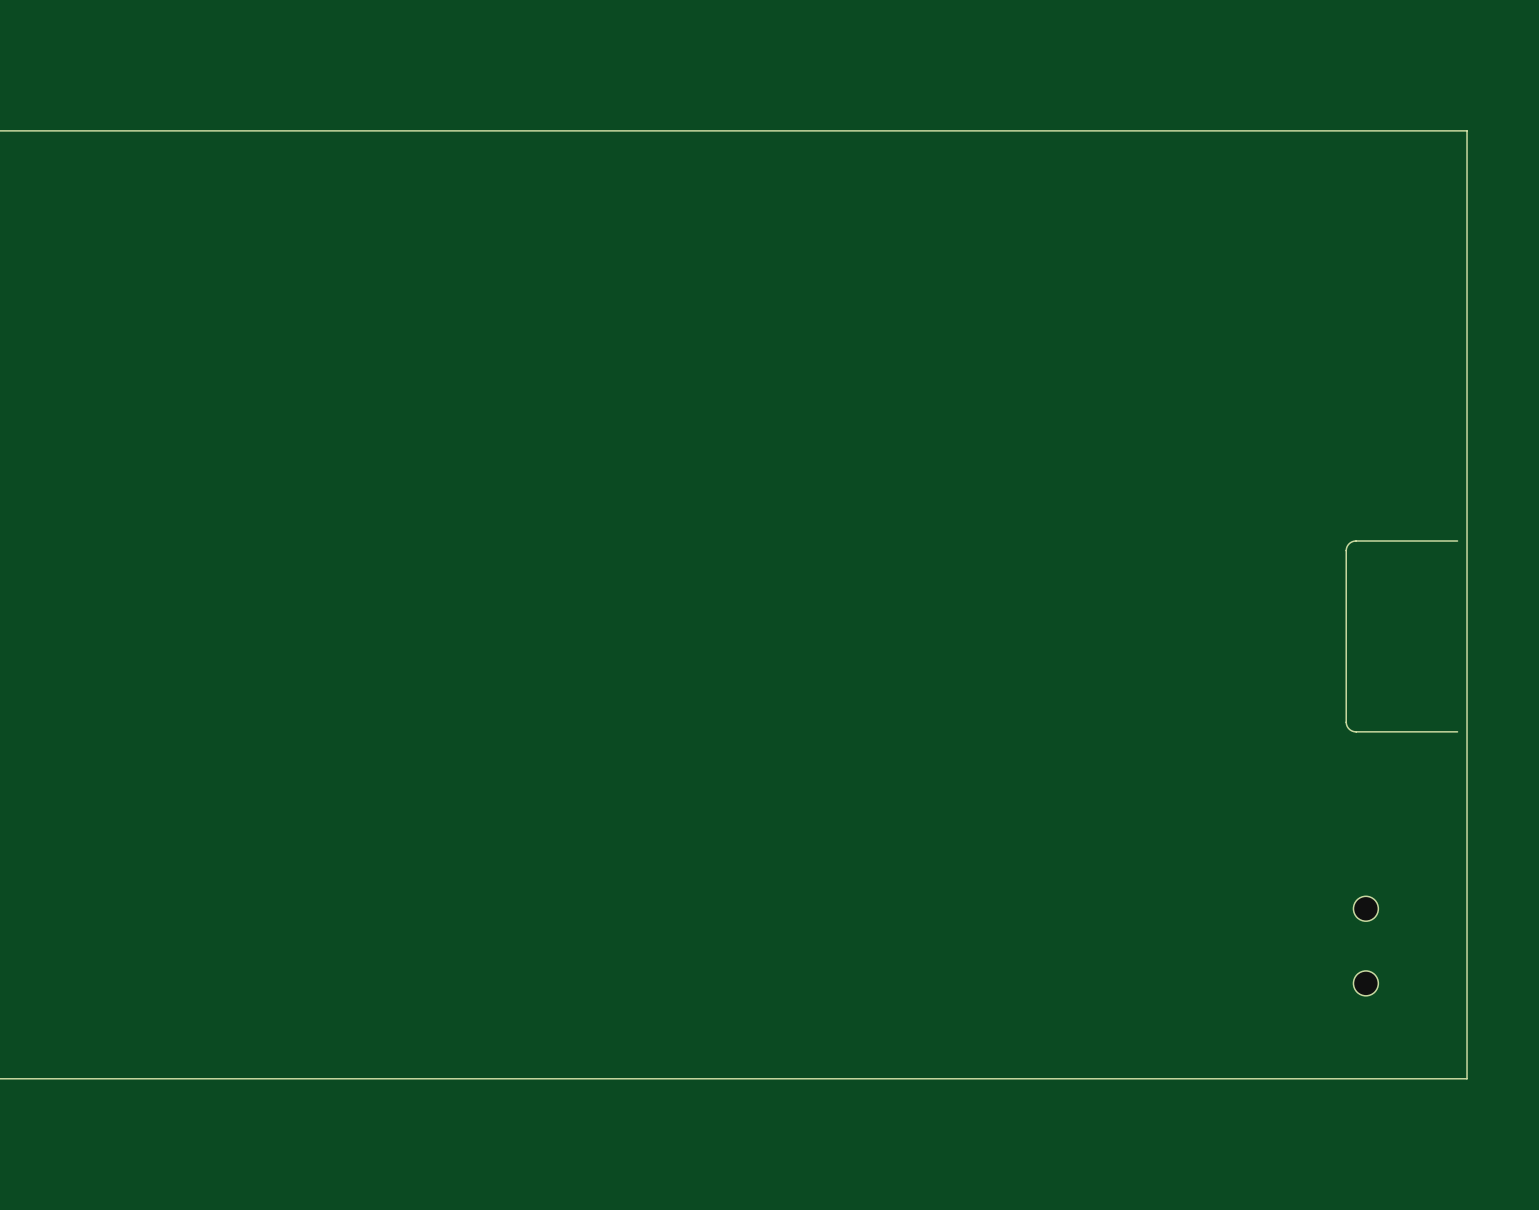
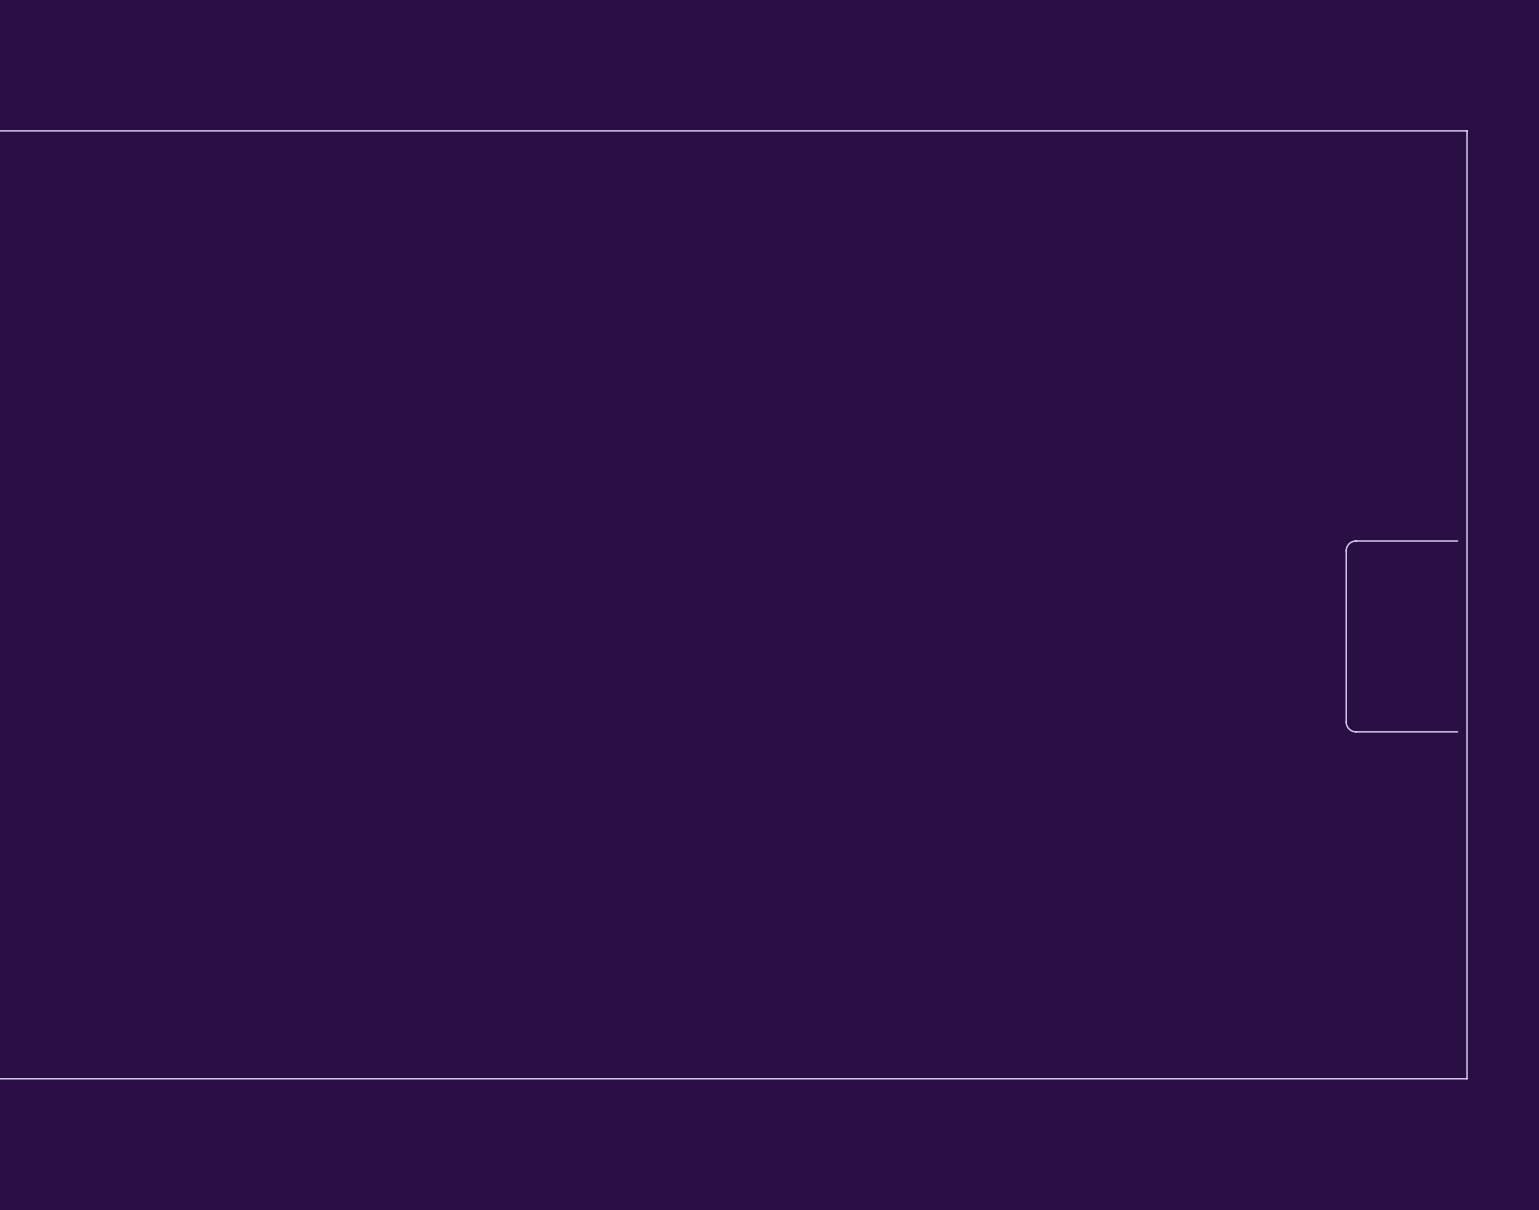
part: (1365, 946) -> none

